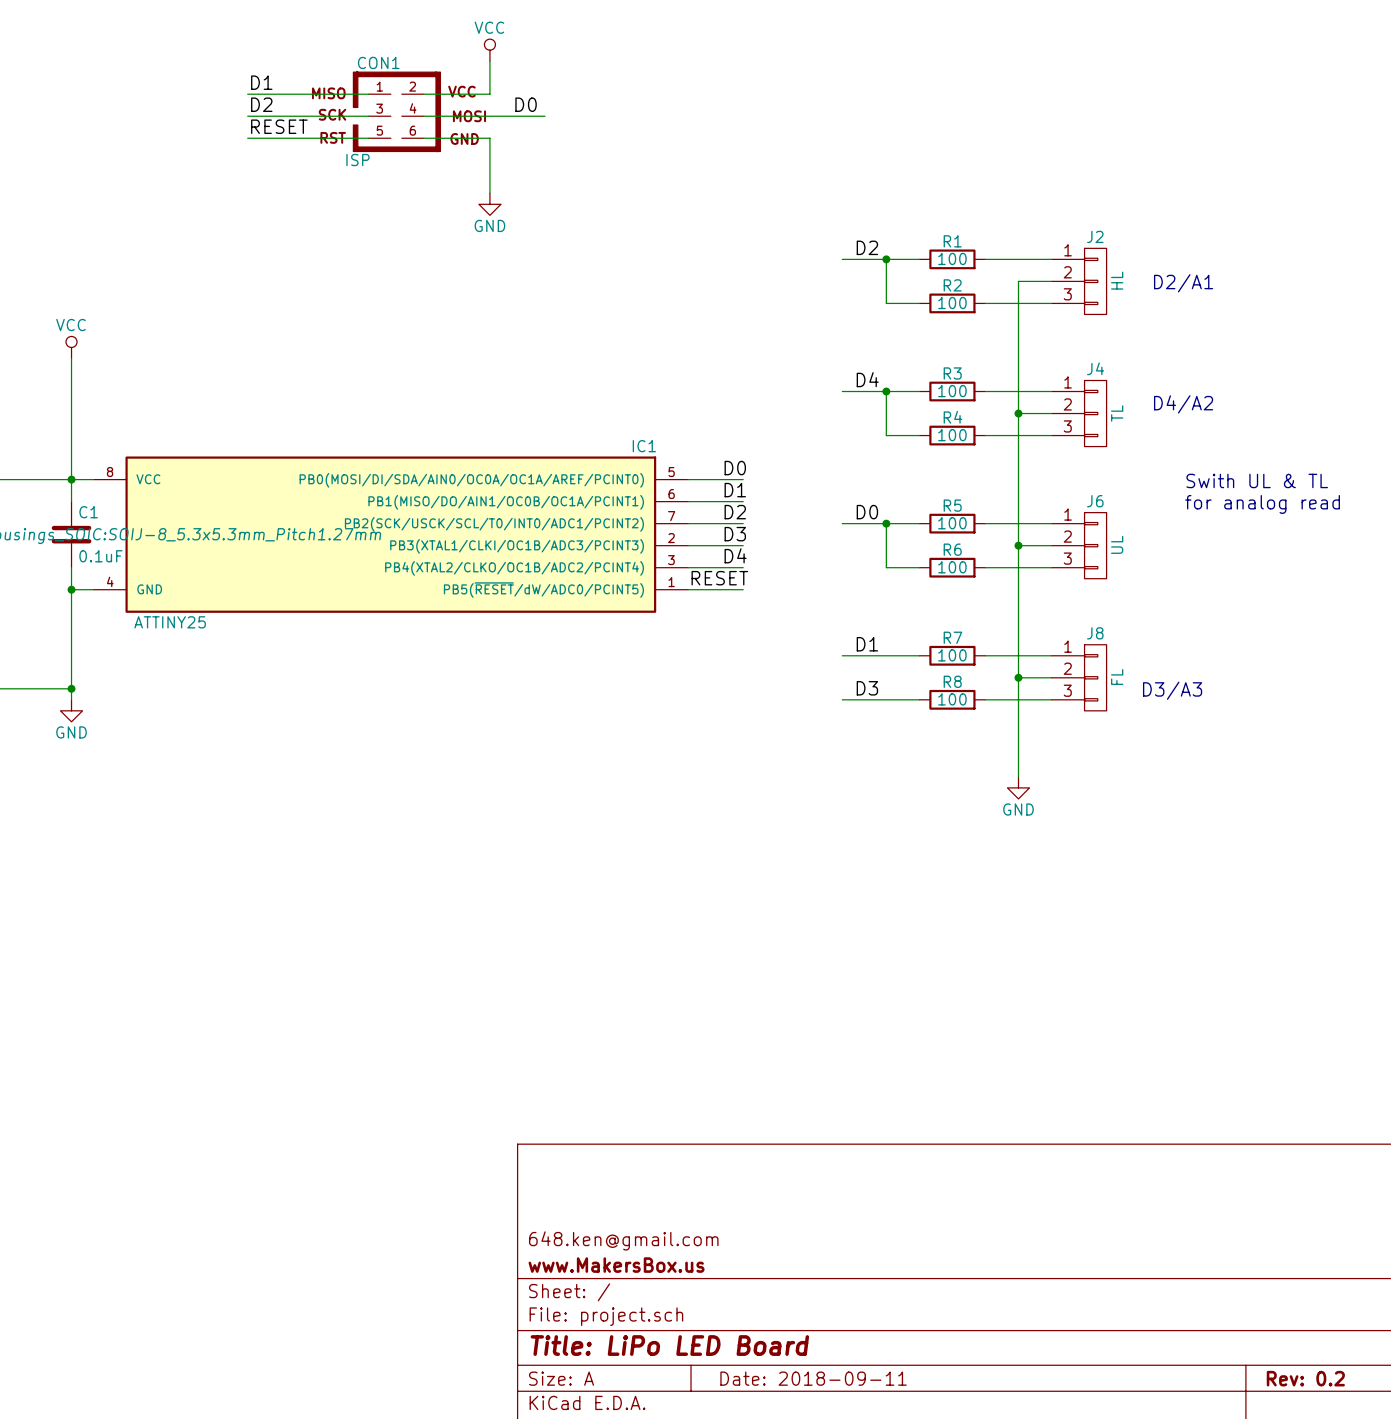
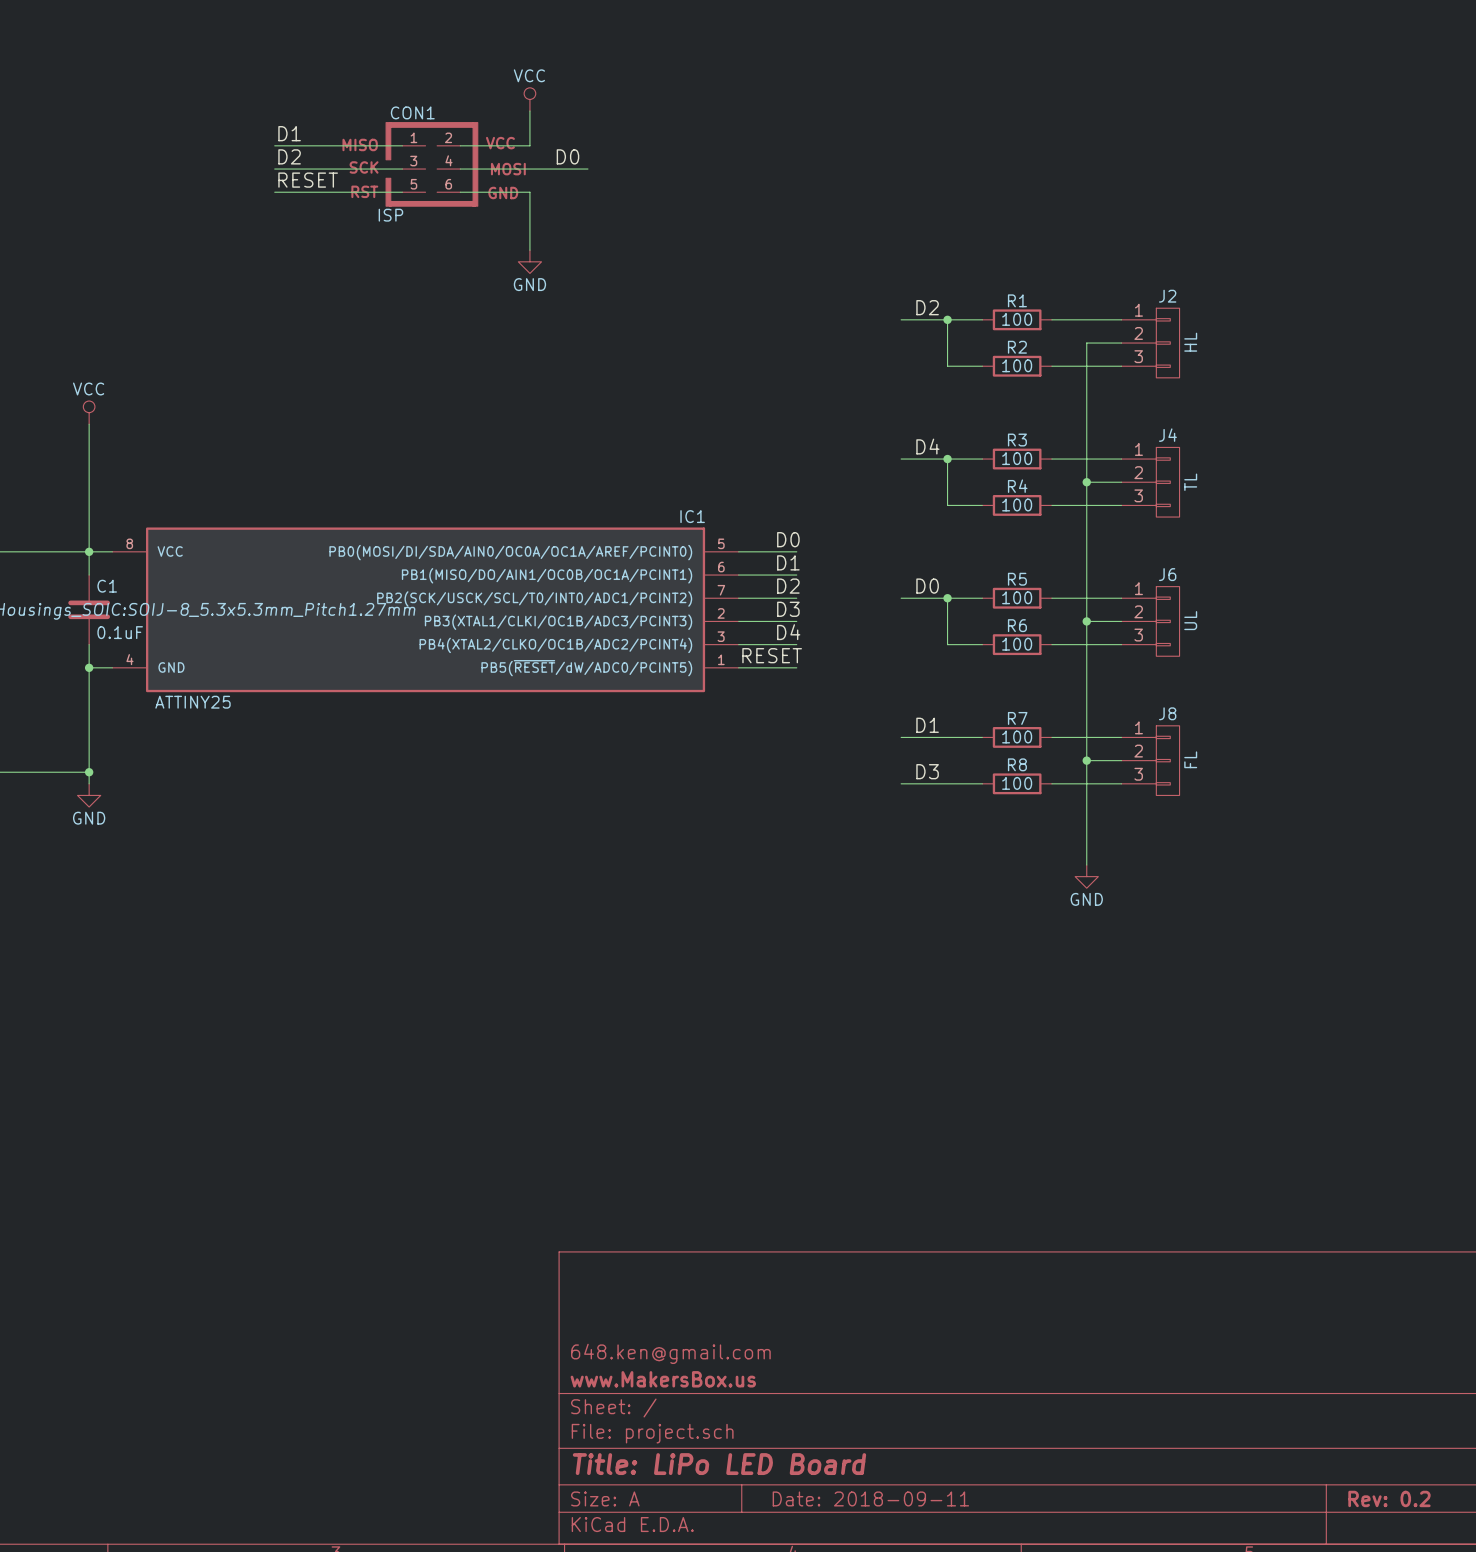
text: D2/A1 (1183, 283) -> none
text: D4/A2 (1183, 404) -> none
text: Swith UL & TL (1257, 480) -> none
text: for analog read (1262, 504) -> none
text: D3/A3 (1172, 690) -> none

